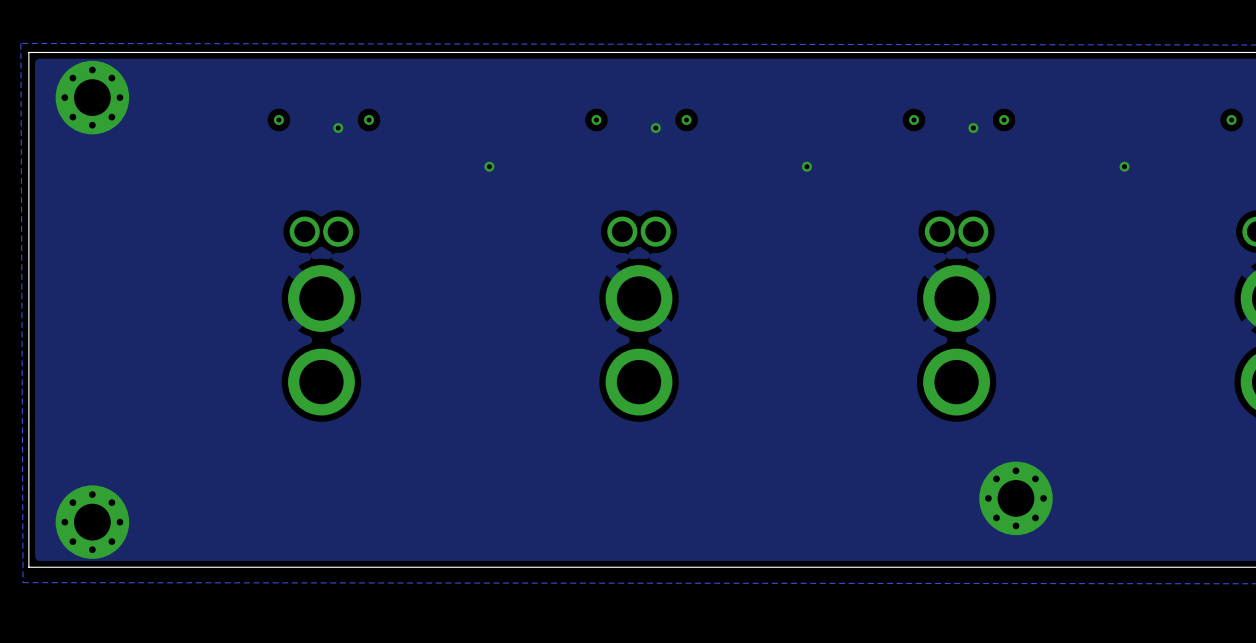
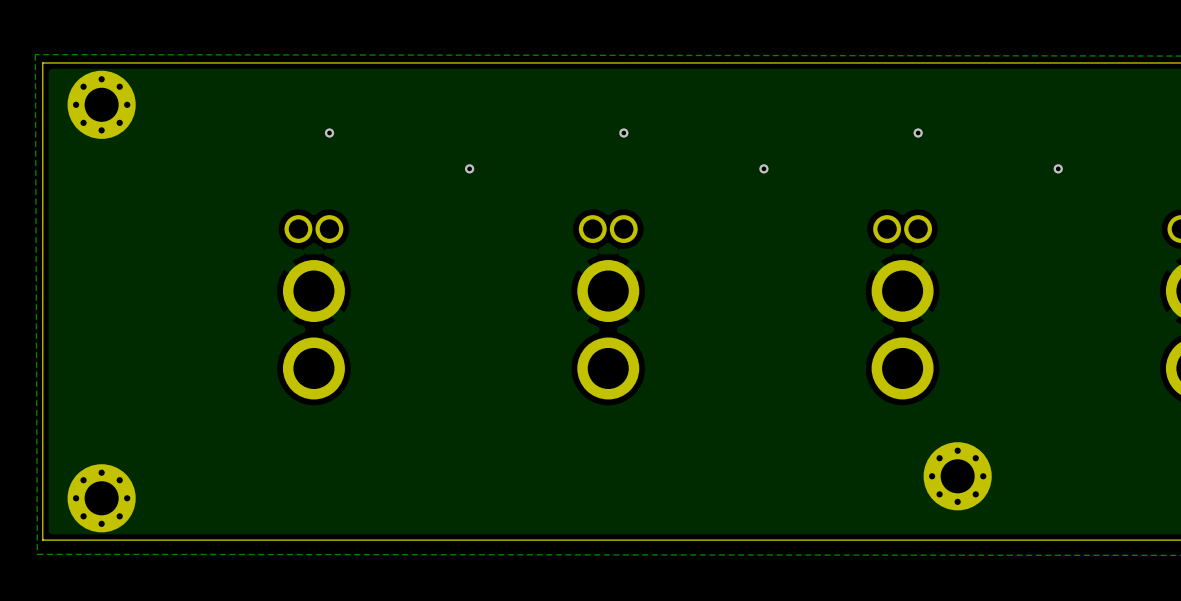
via: (278, 120) -> none
via: (369, 120) -> none
via: (596, 120) -> none
via: (686, 120) -> none
via: (914, 120) -> none
via: (1004, 120) -> none
via: (1231, 120) -> none

